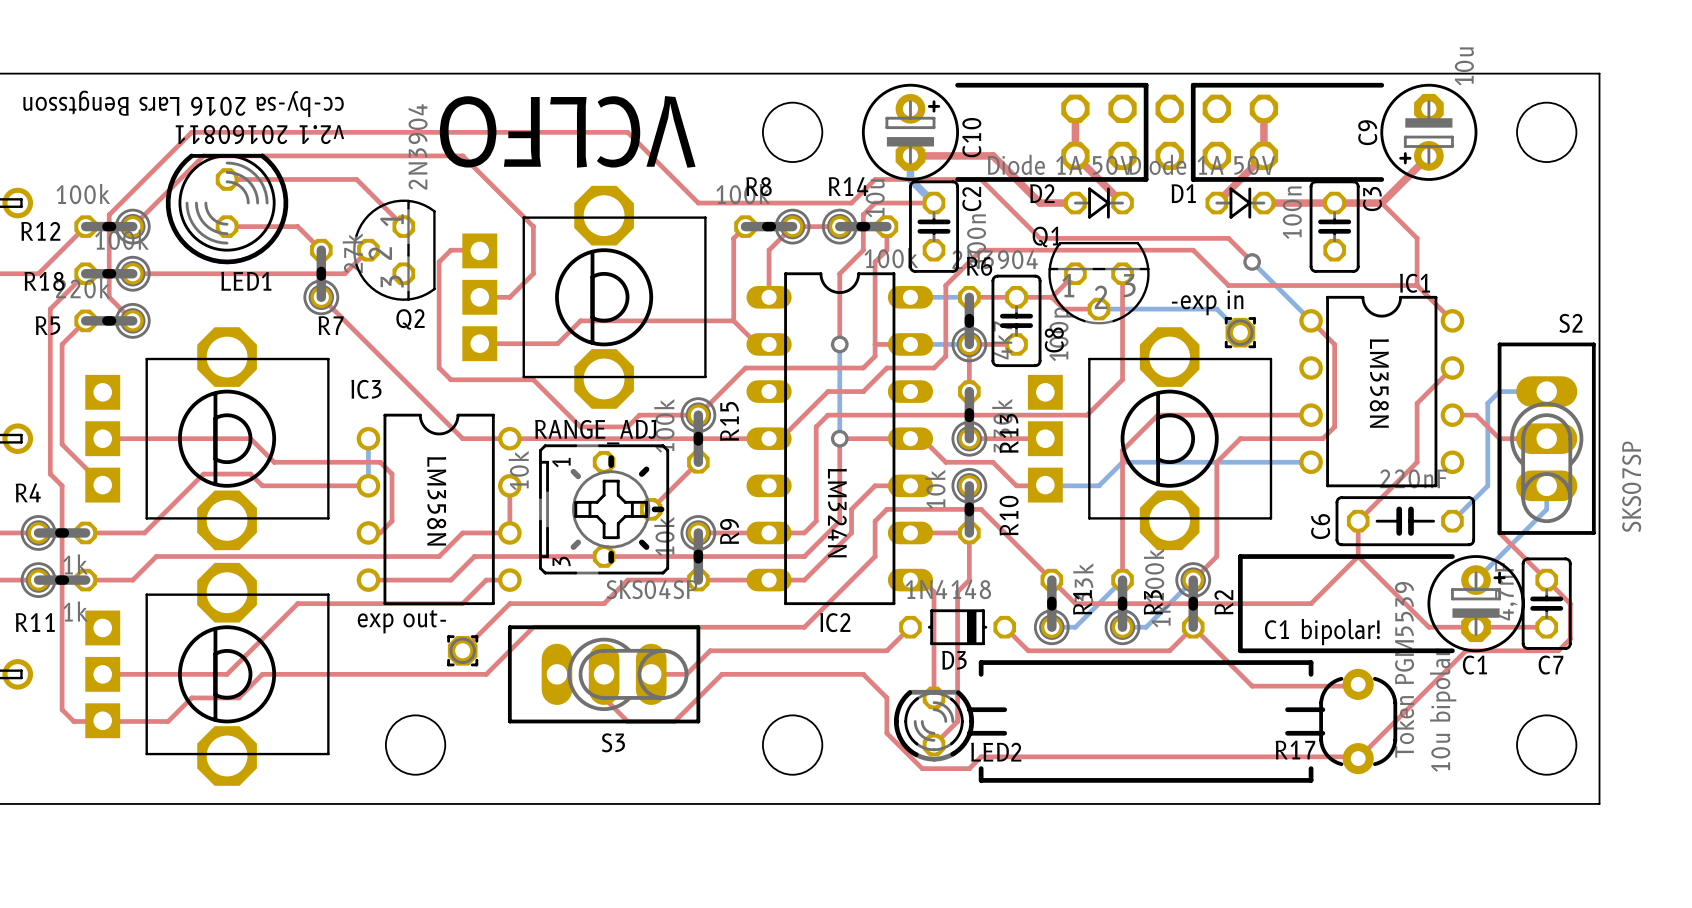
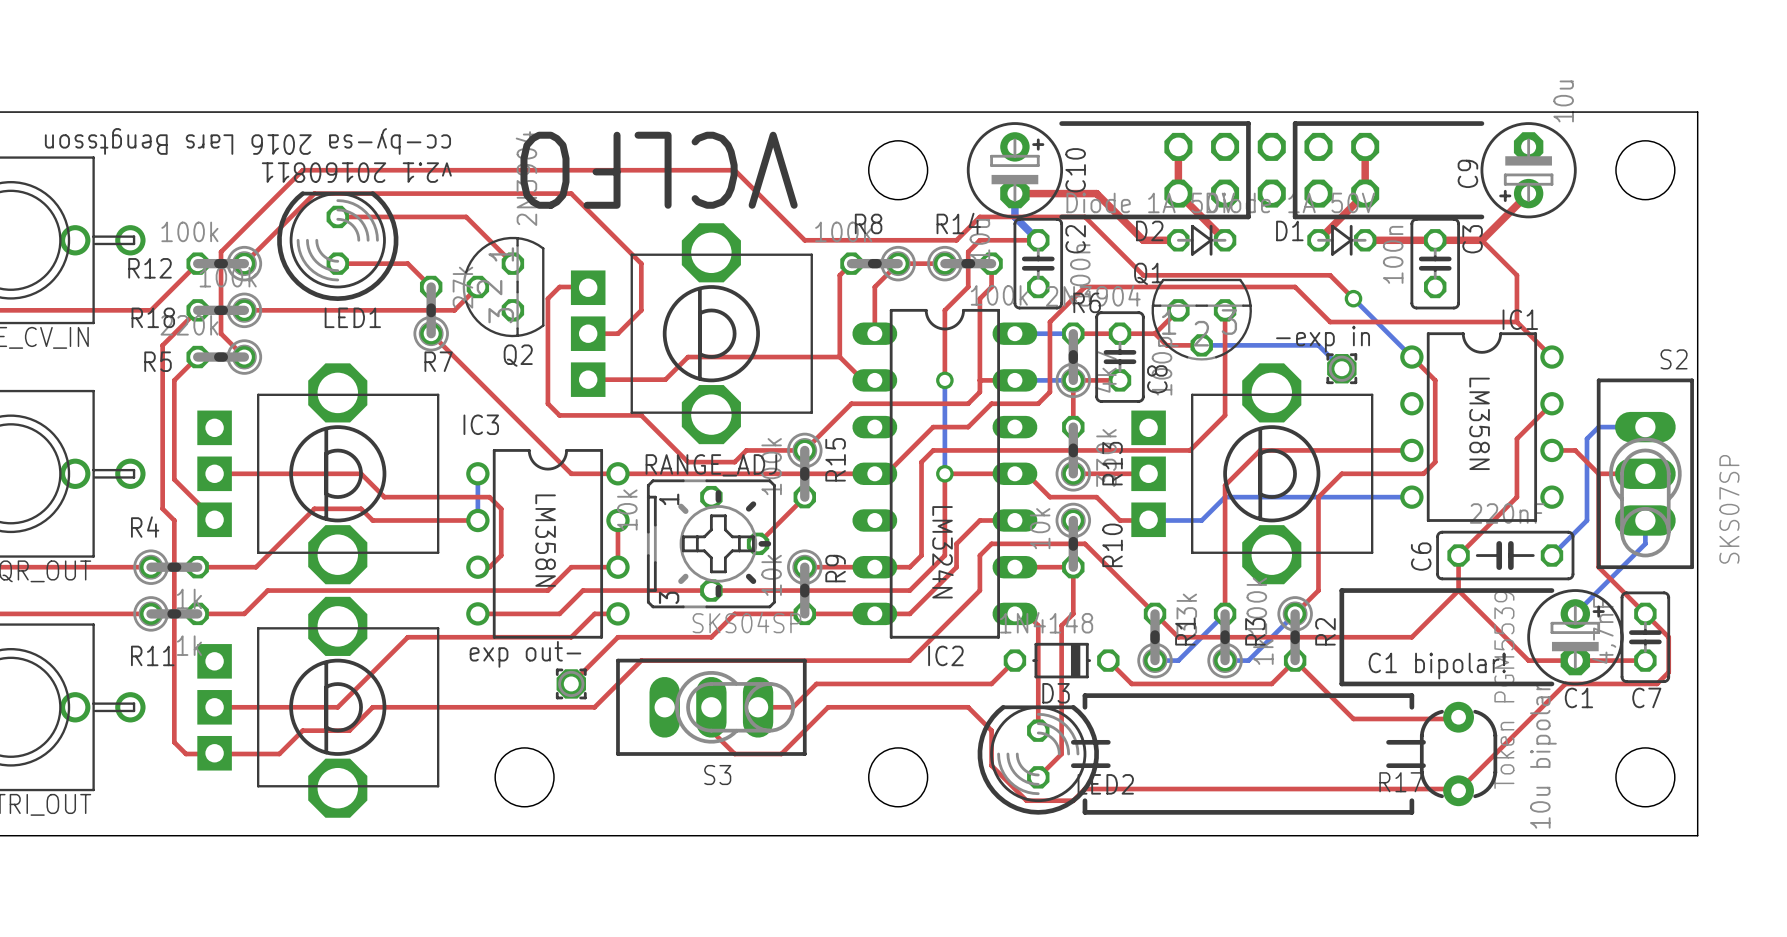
LED2 footprint: [893, 686, 975, 762] -> [977, 704, 1099, 815]

